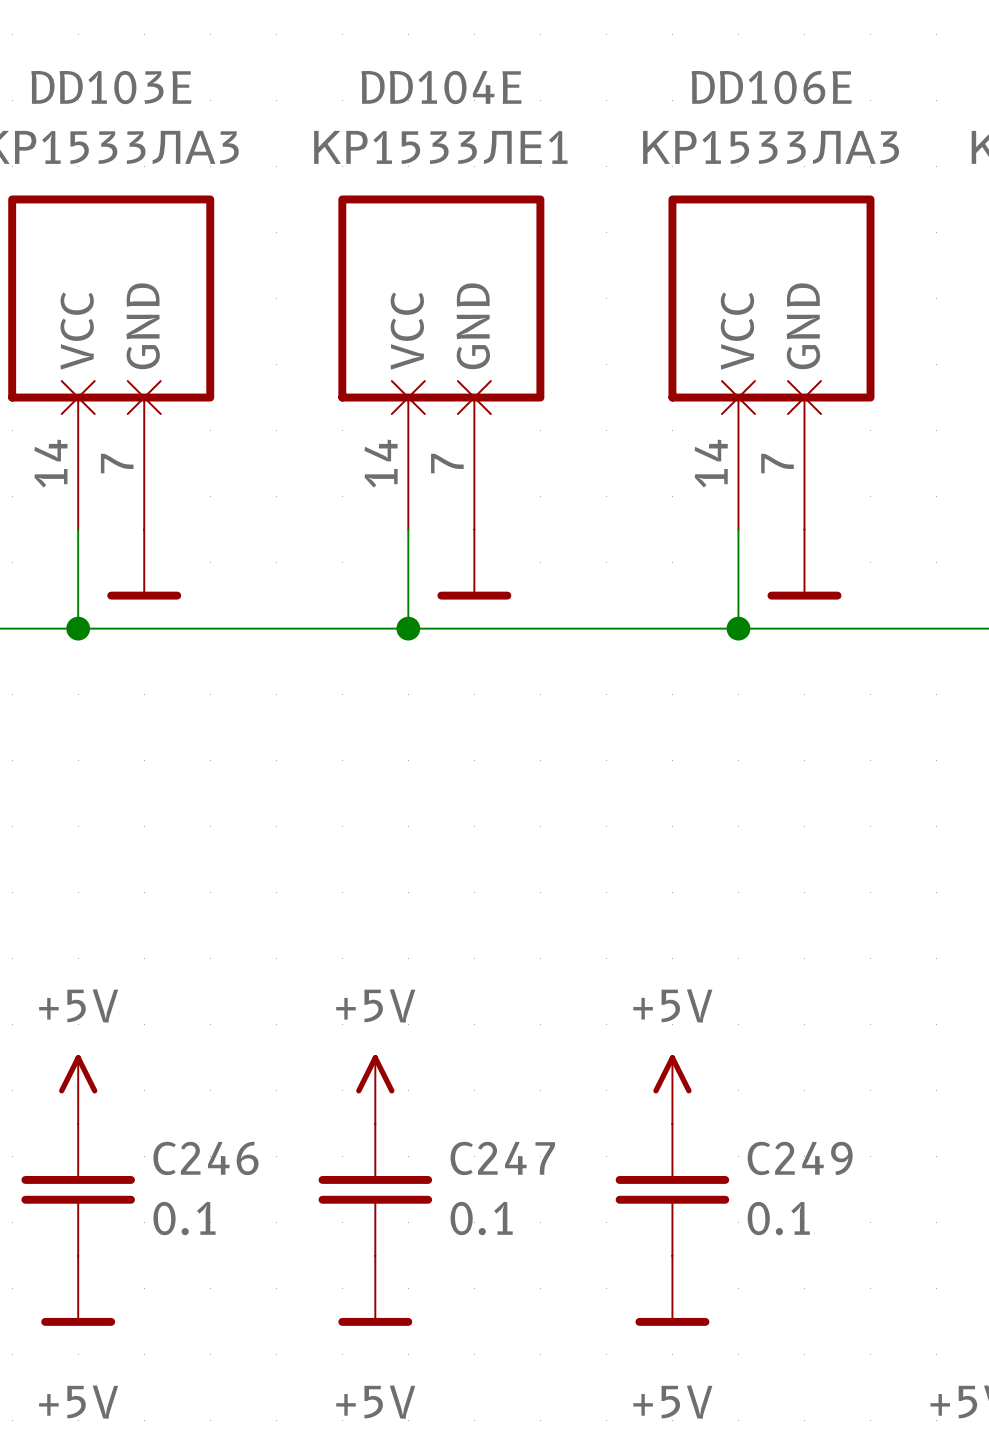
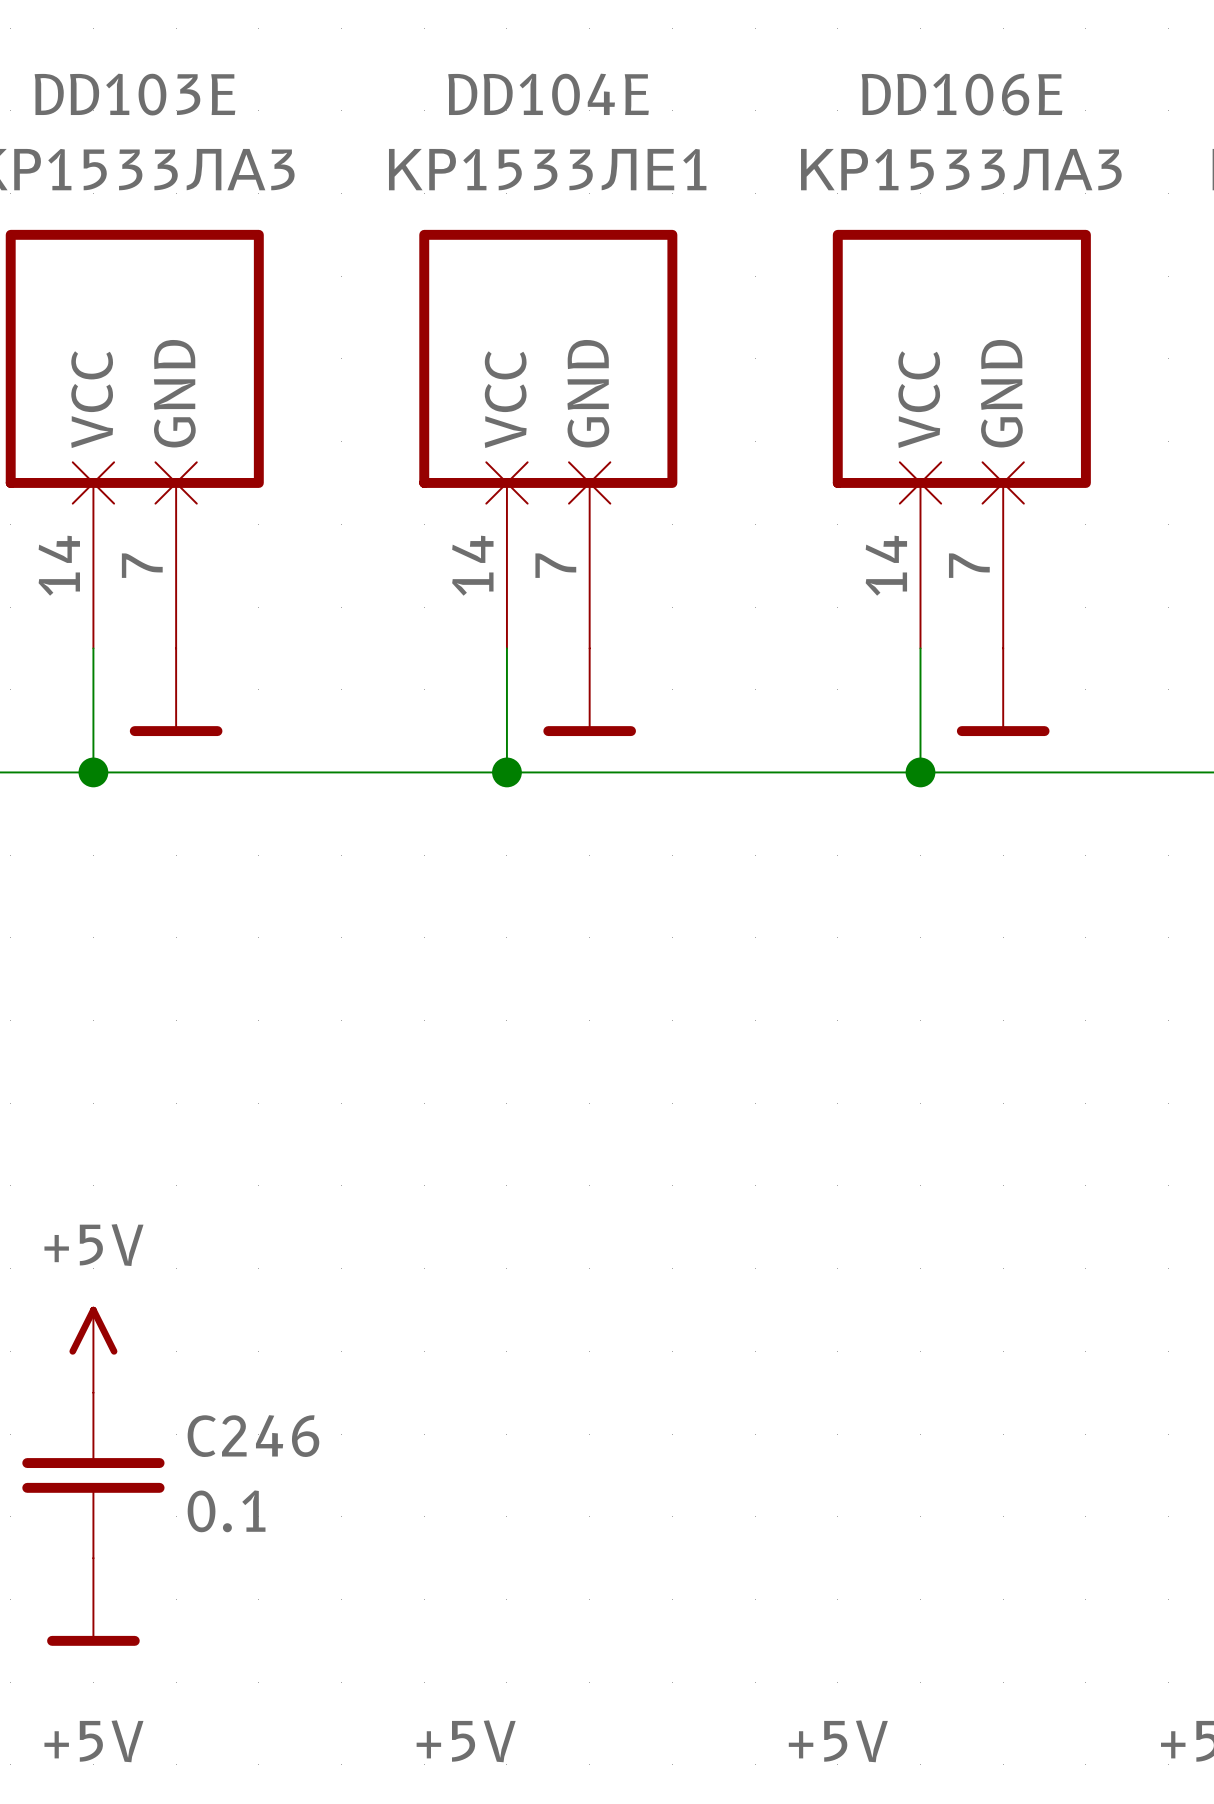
power symbol: +5V (375, 1089) -> none
power symbol: +5V (672, 1089) -> none
C247: 0.1 (375, 1189) -> none
C249: 0.1 (672, 1189) -> none
power symbol: (375, 1290) -> none
power symbol: (672, 1290) -> none

